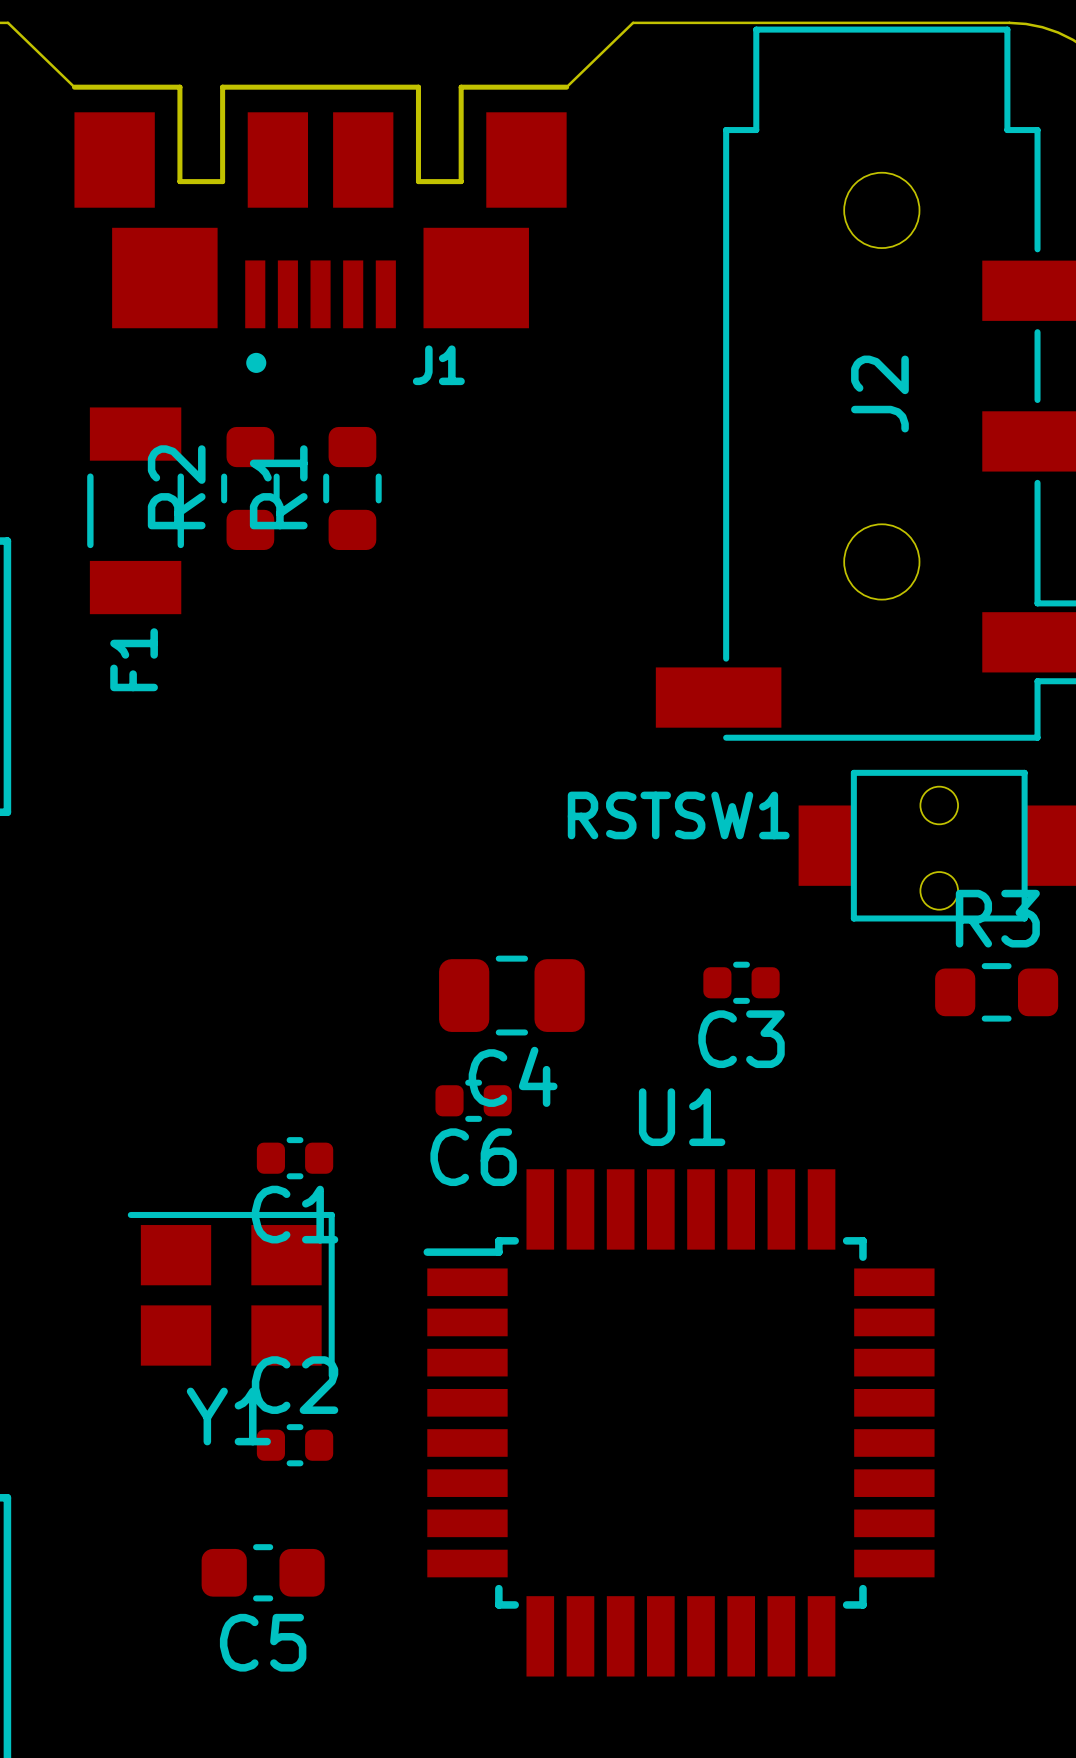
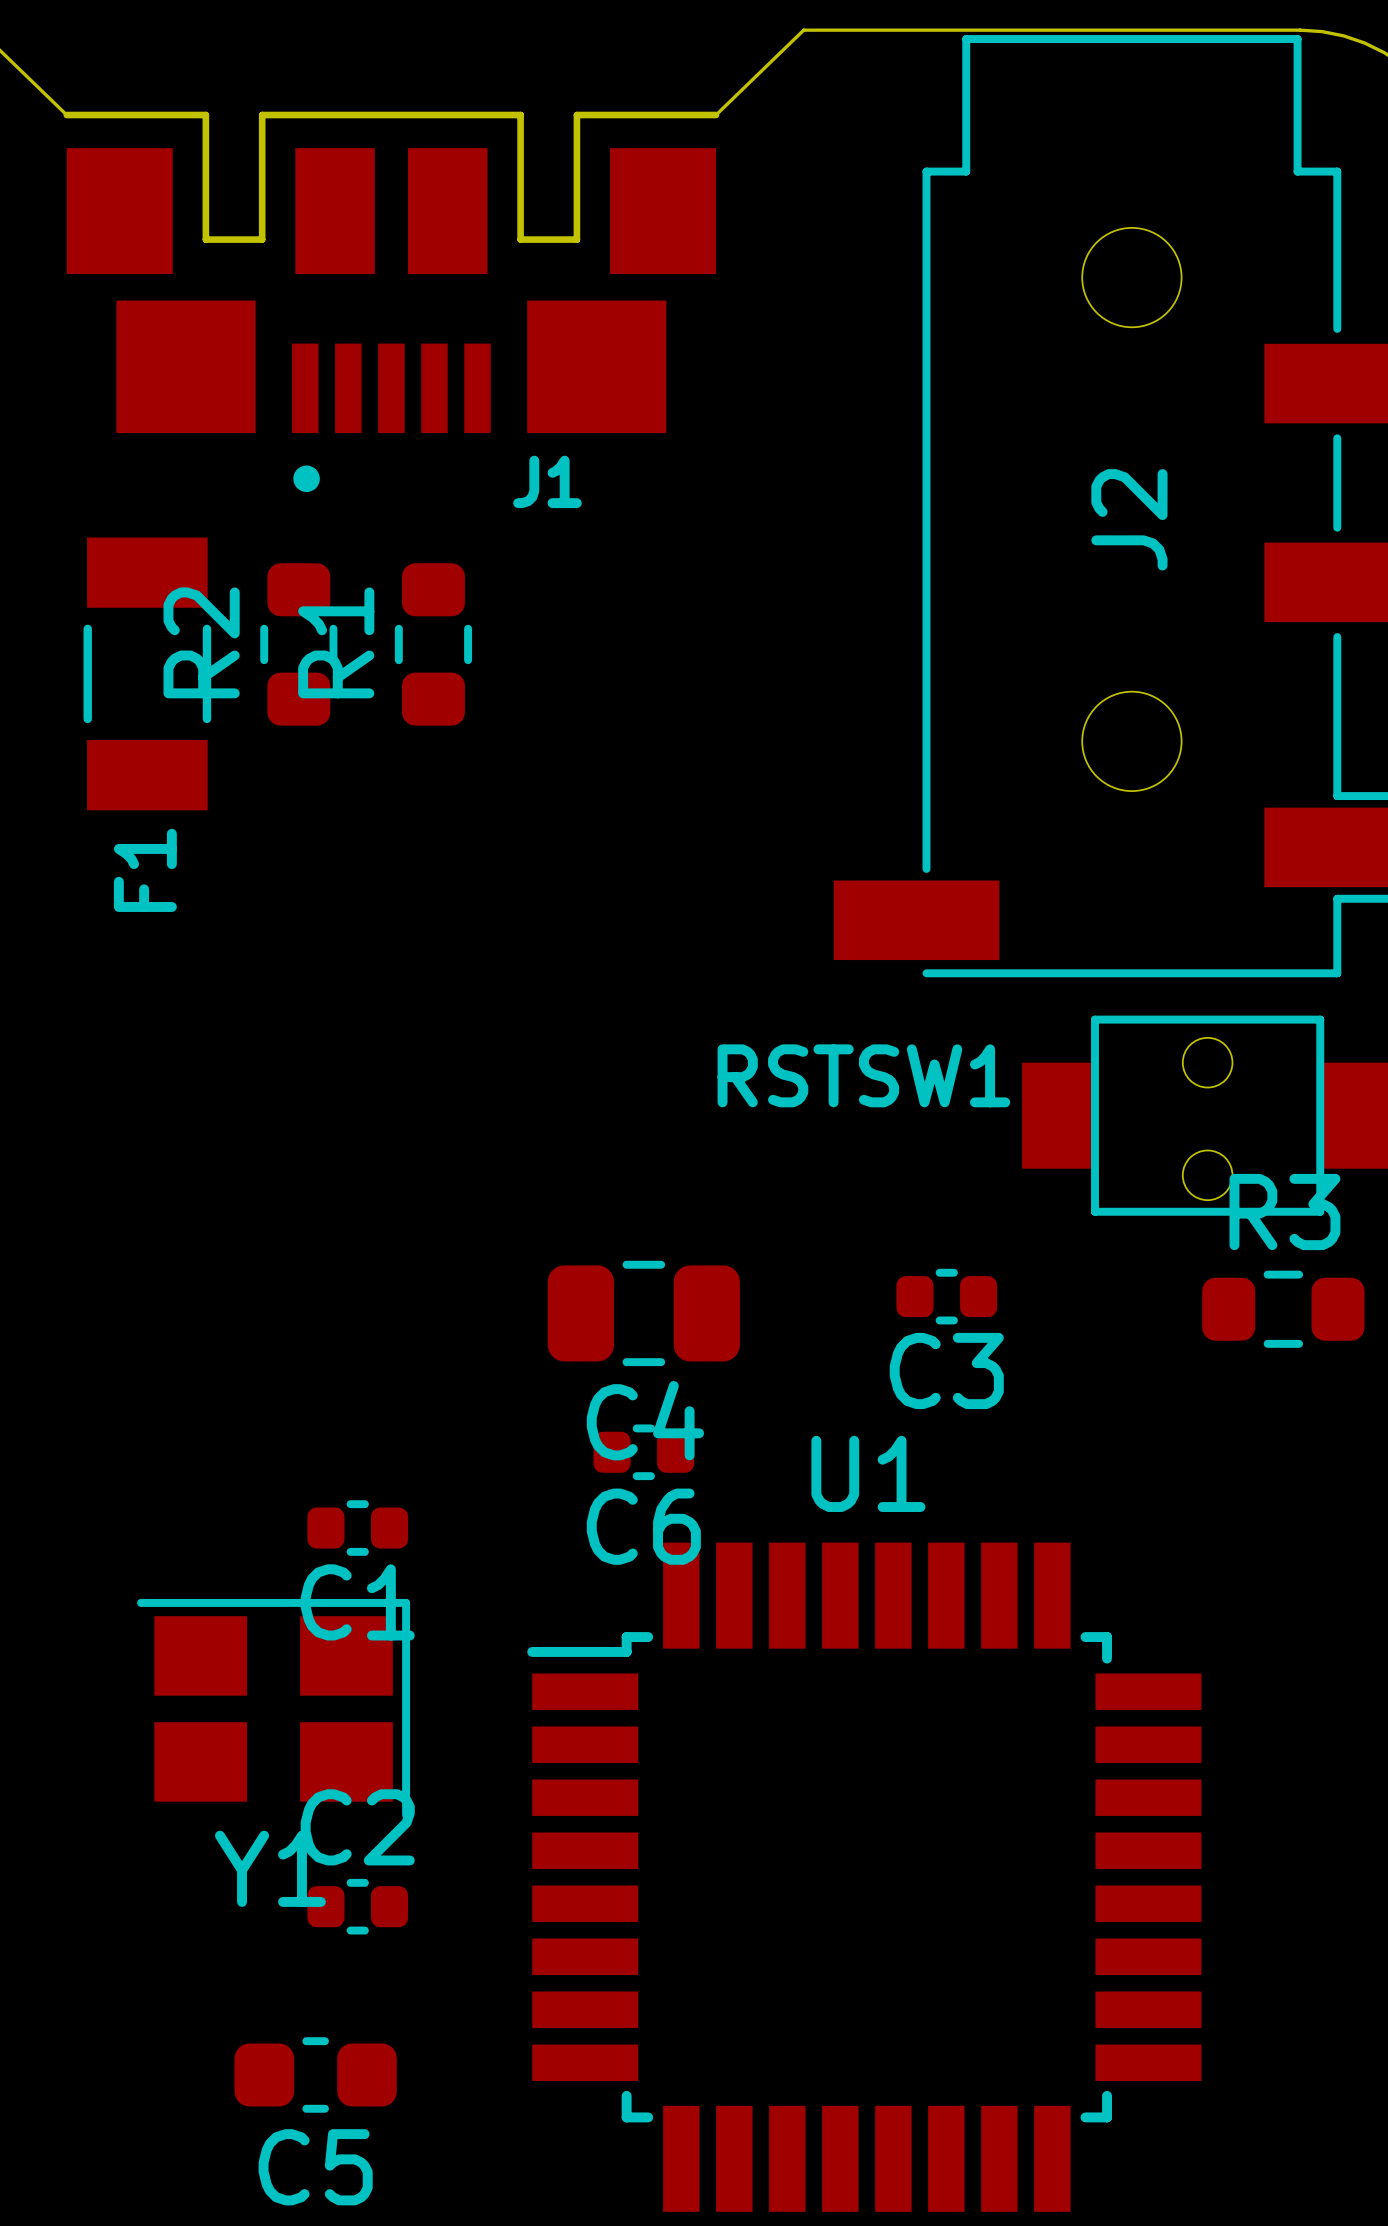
C6 position: (473, 1100) -> (643, 1452)

